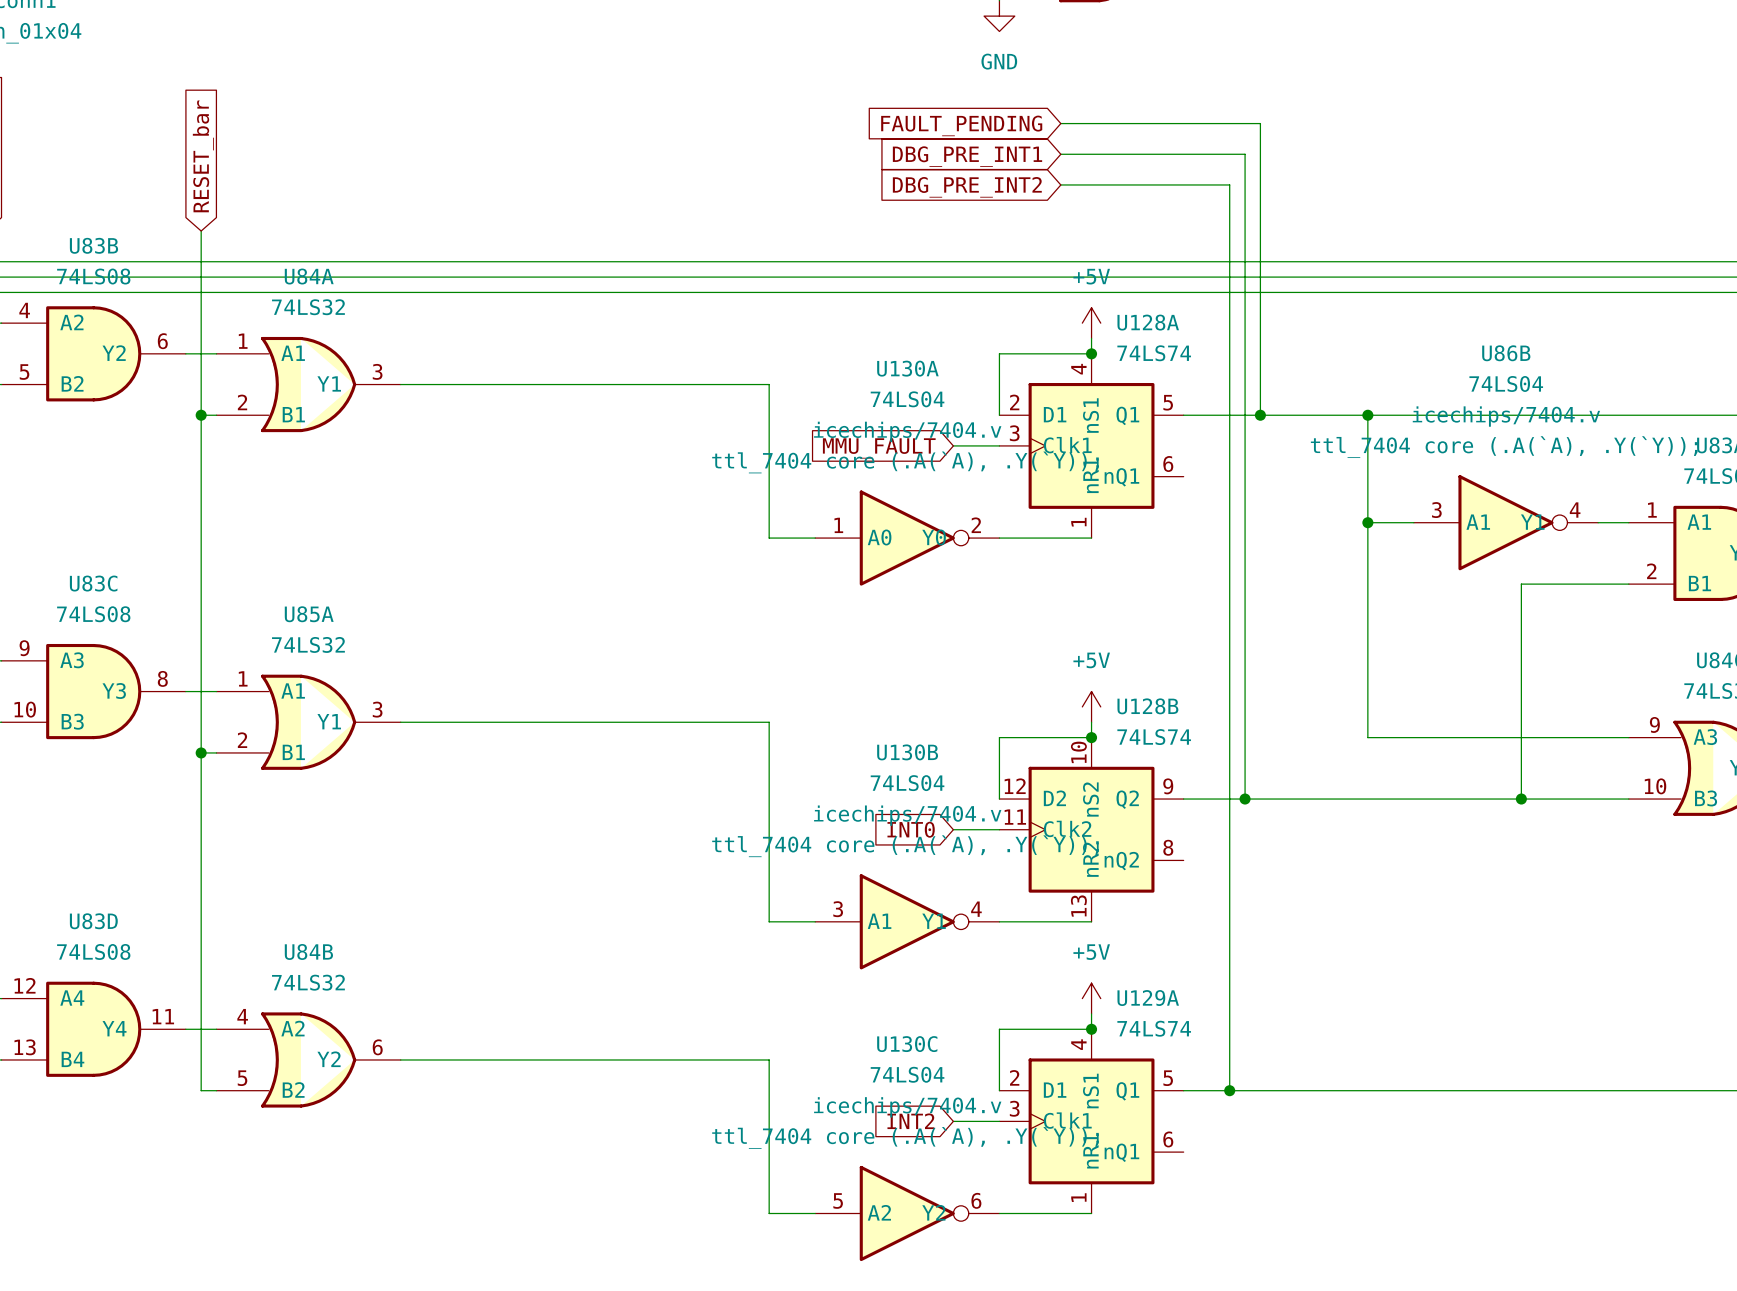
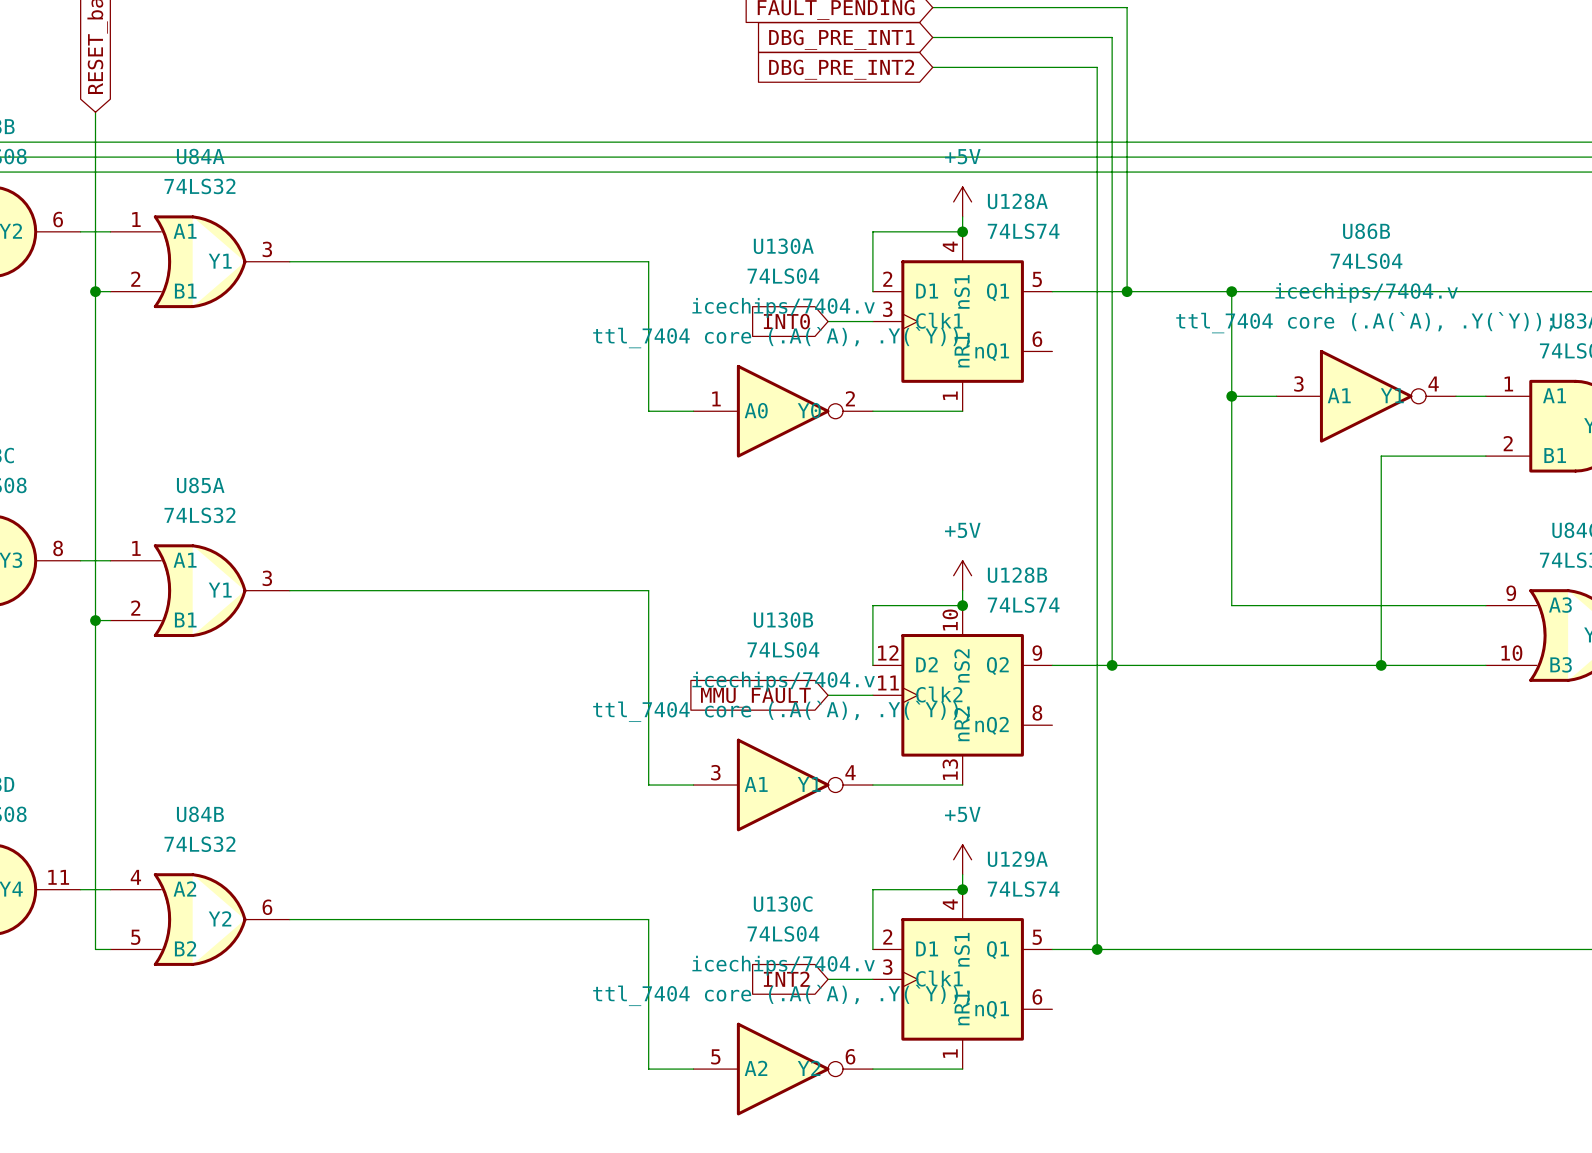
global label: MMU_FAULT (879, 448) -> INT0 (786, 321)
global label: INT0 (911, 829) -> MMU_FAULT (755, 697)

